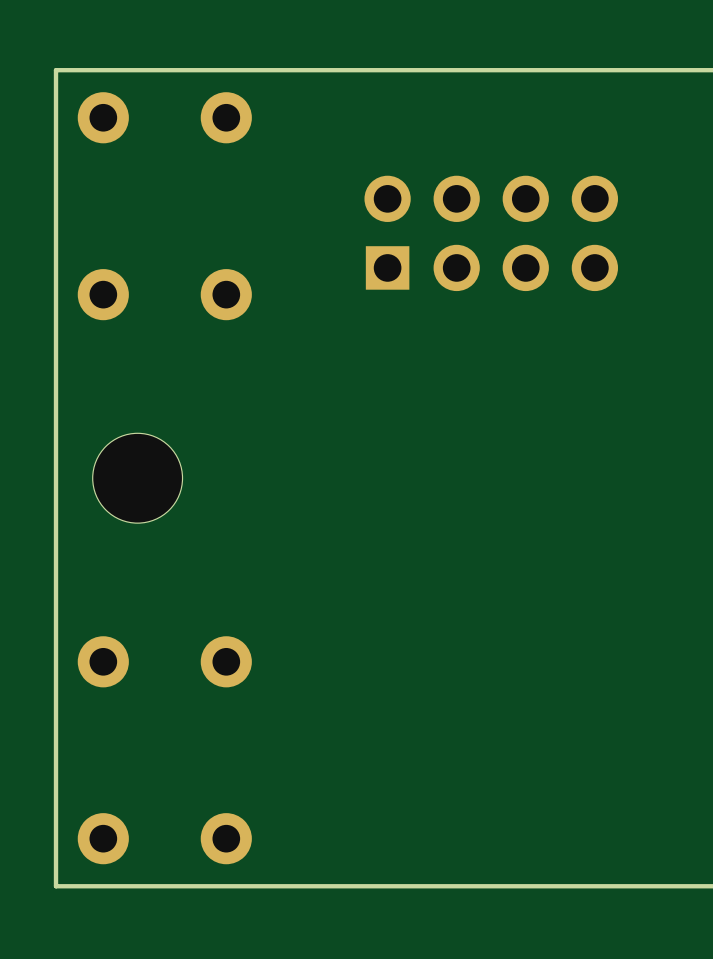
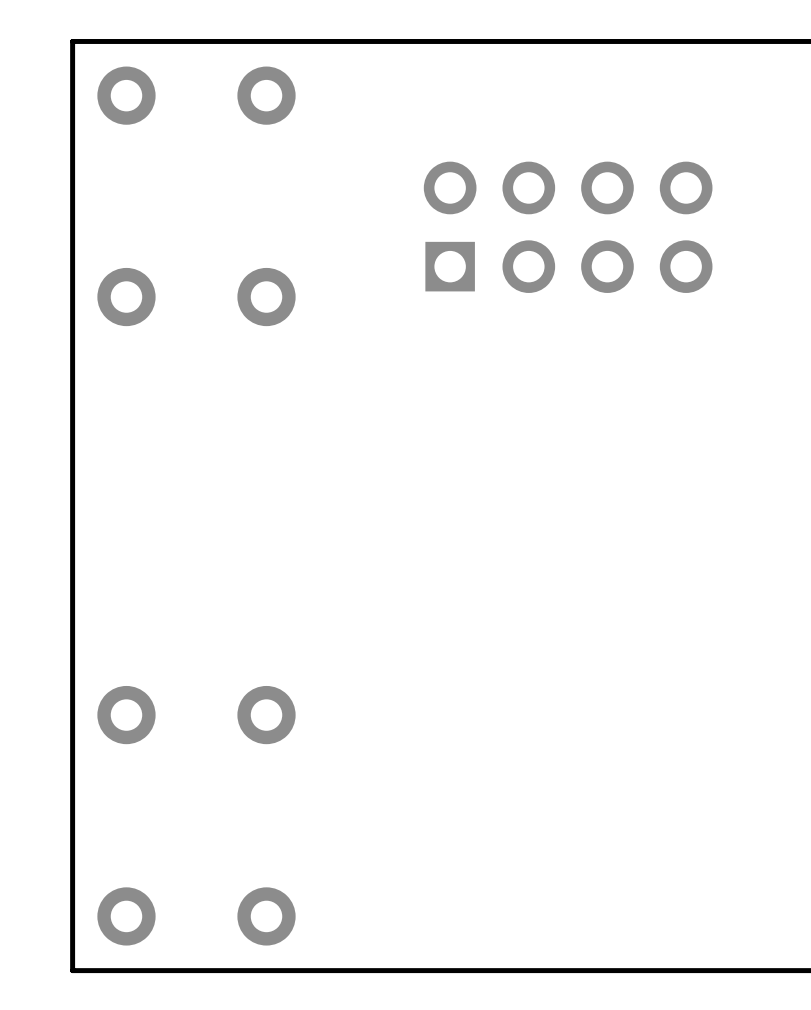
part: (137, 478) -> none

